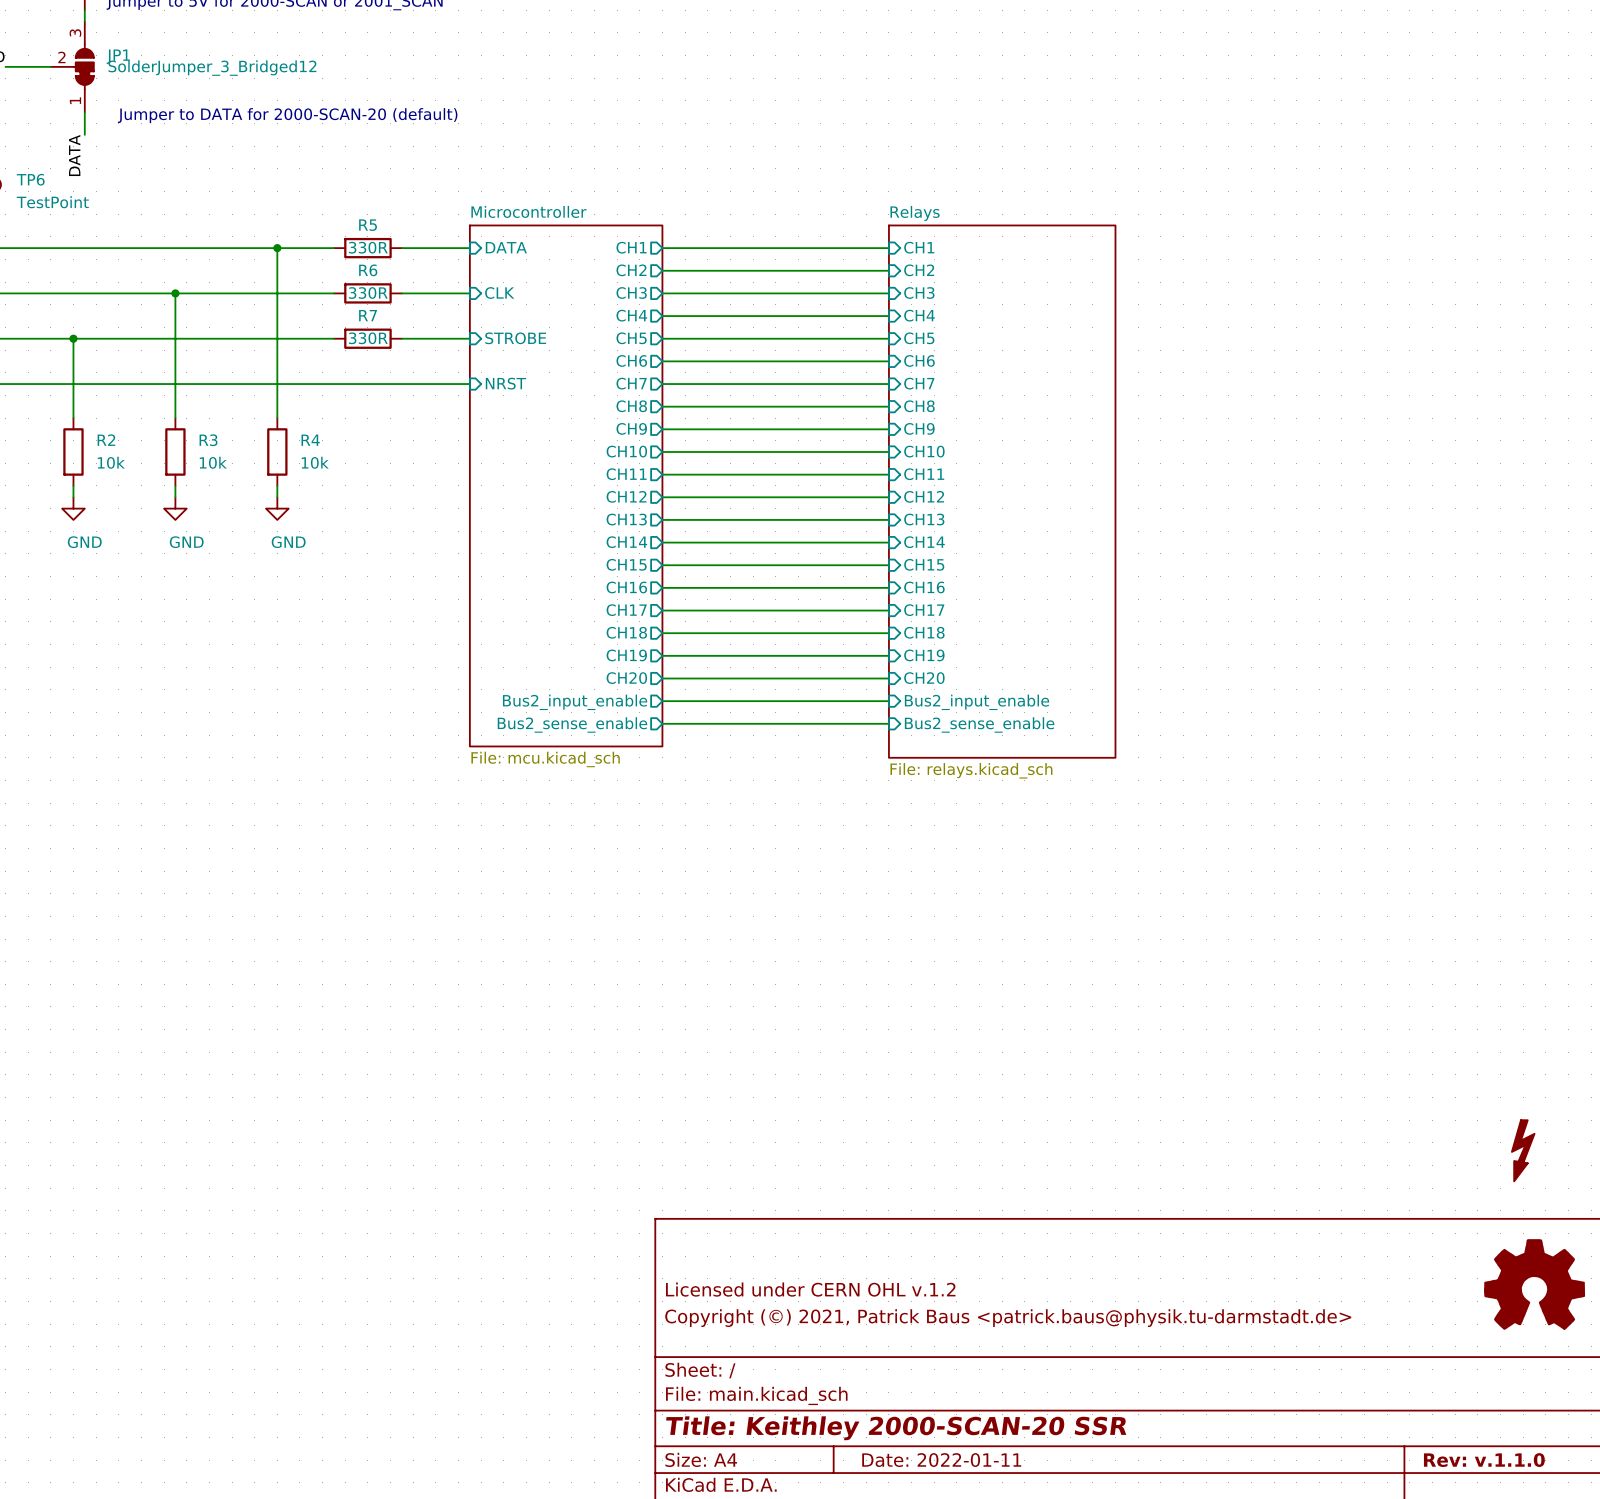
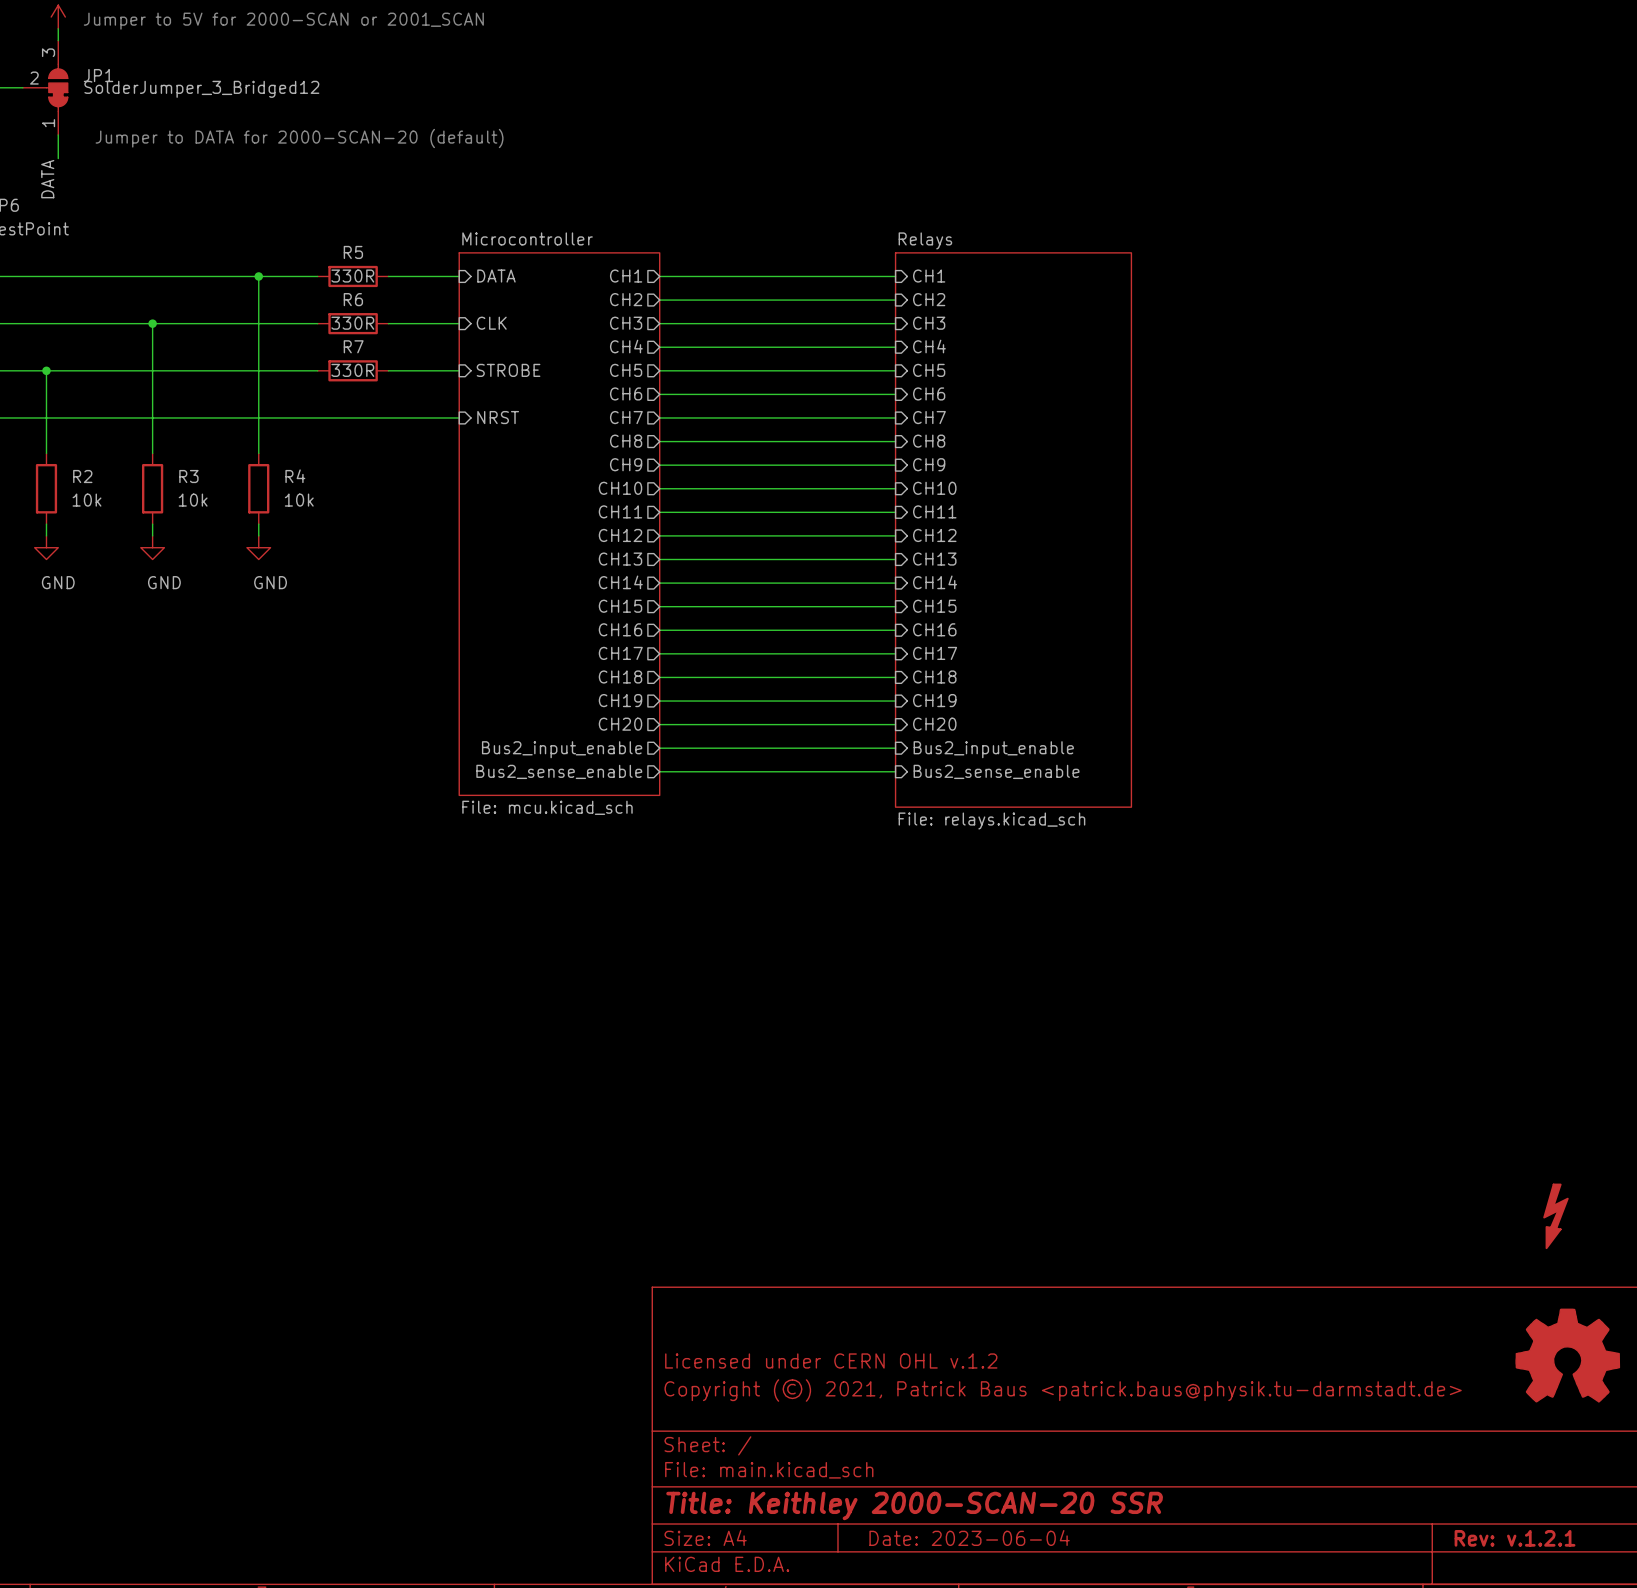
title block: Date: 2022-01-11 (941, 1460) -> Date: 2023-06-04 (969, 1538)
title block: Rev: v.1.1.0 (1484, 1460) -> Rev: v.1.2.1 (1515, 1538)

